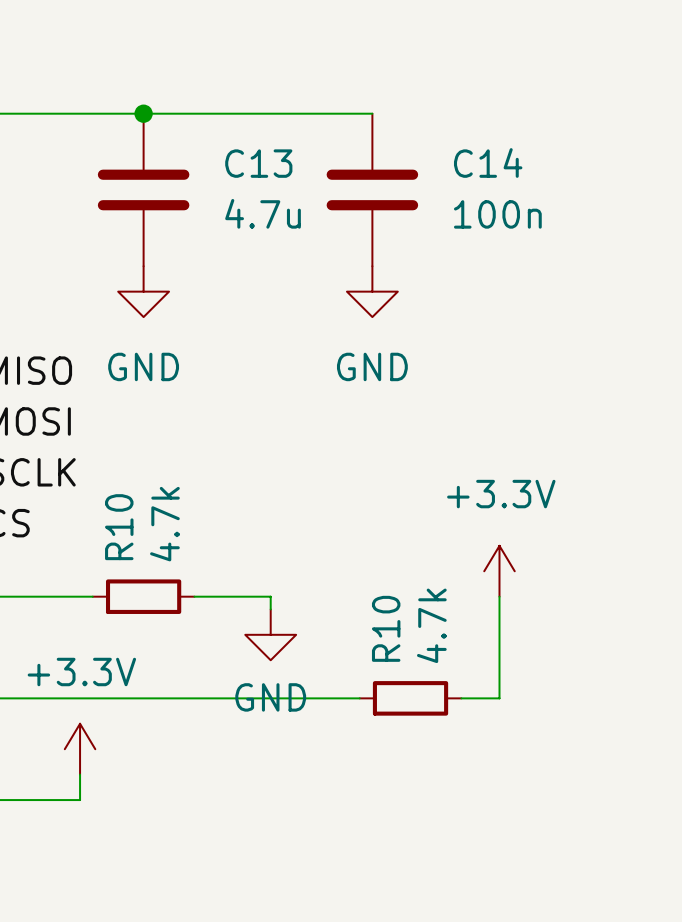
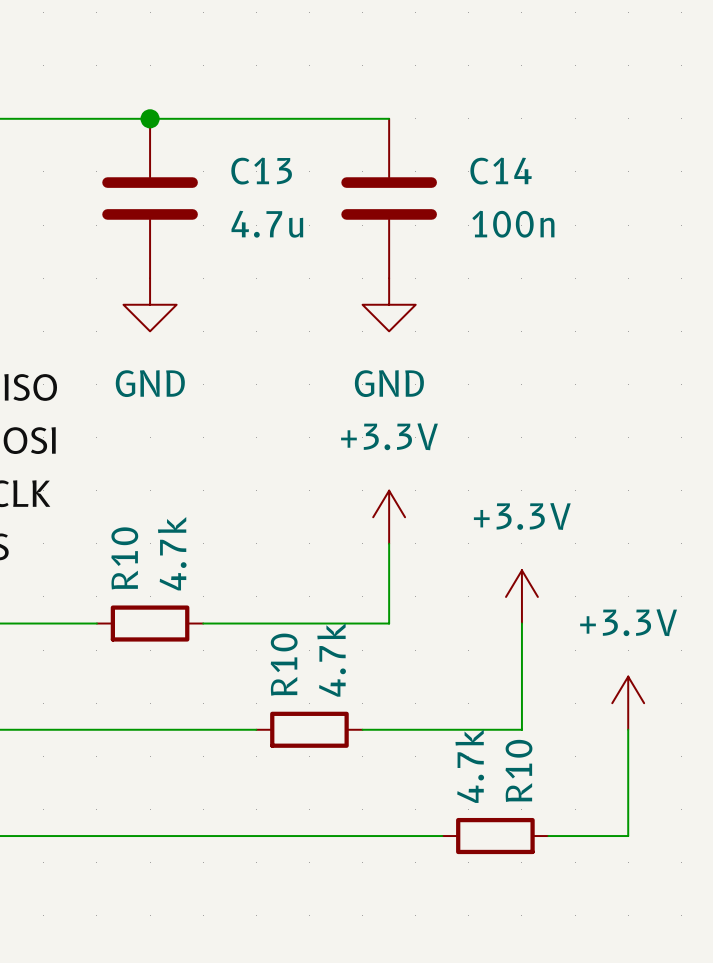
power symbol: none -> +3.3V (389, 517)
wire: (270, 596) (270, 609) -> (282, 623) (389, 623) (389, 543)
power symbol: GND (270, 634) -> none
power symbol: none -> +3.3V (628, 703)
wire: (245, 698) (346, 698) -> (375, 729) (482, 729)
R10: none -> 4.7k (309, 729)
R10: 4.7k (410, 698) -> none
wire: none -> (628, 729) (628, 836) (548, 836)
power symbol: +3.3V (80, 749) -> none
wire: (80, 774) (80, 800) -> (442, 836) (83, 836)
R10: none -> 4.7k (495, 836)

